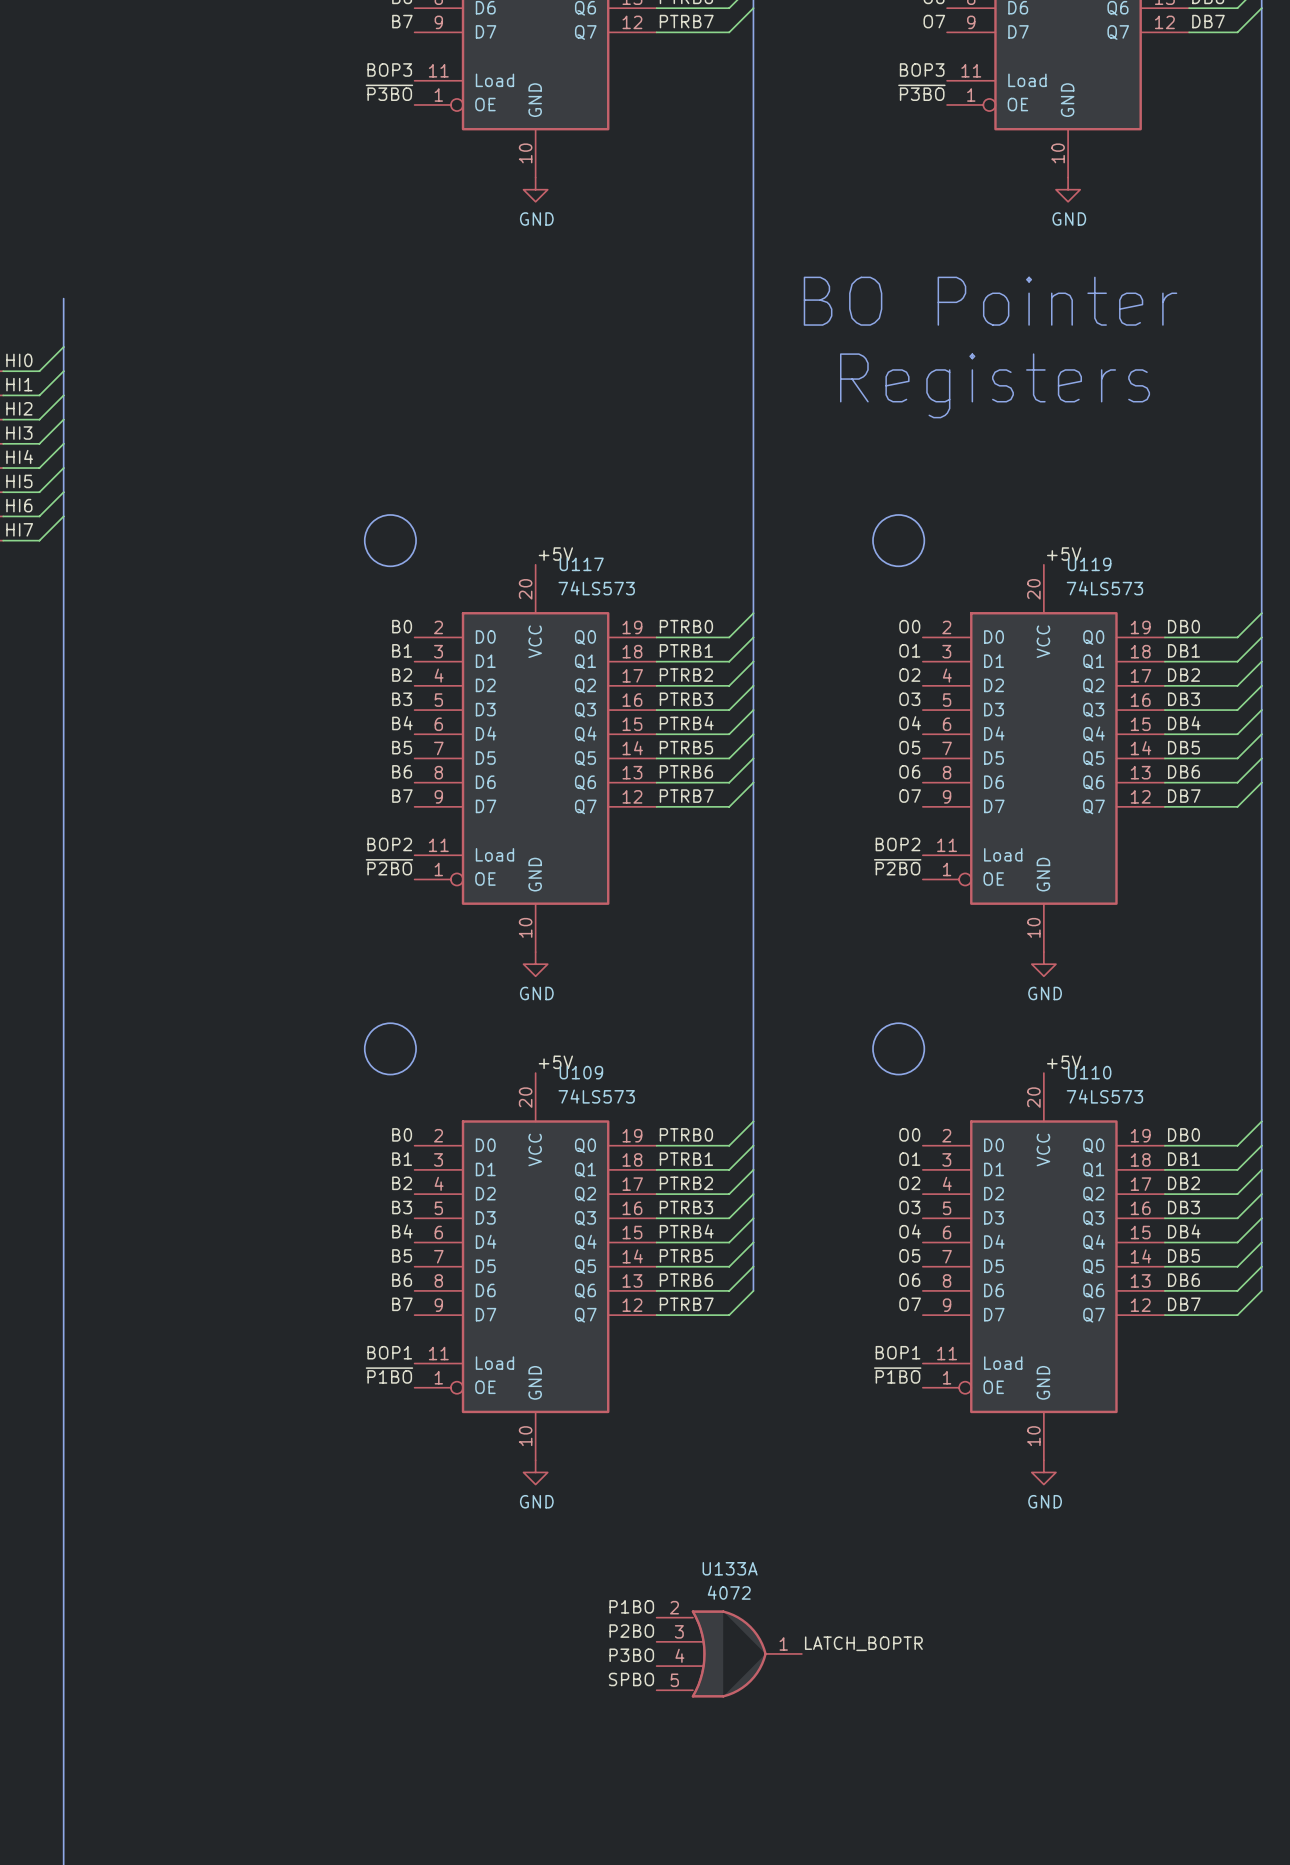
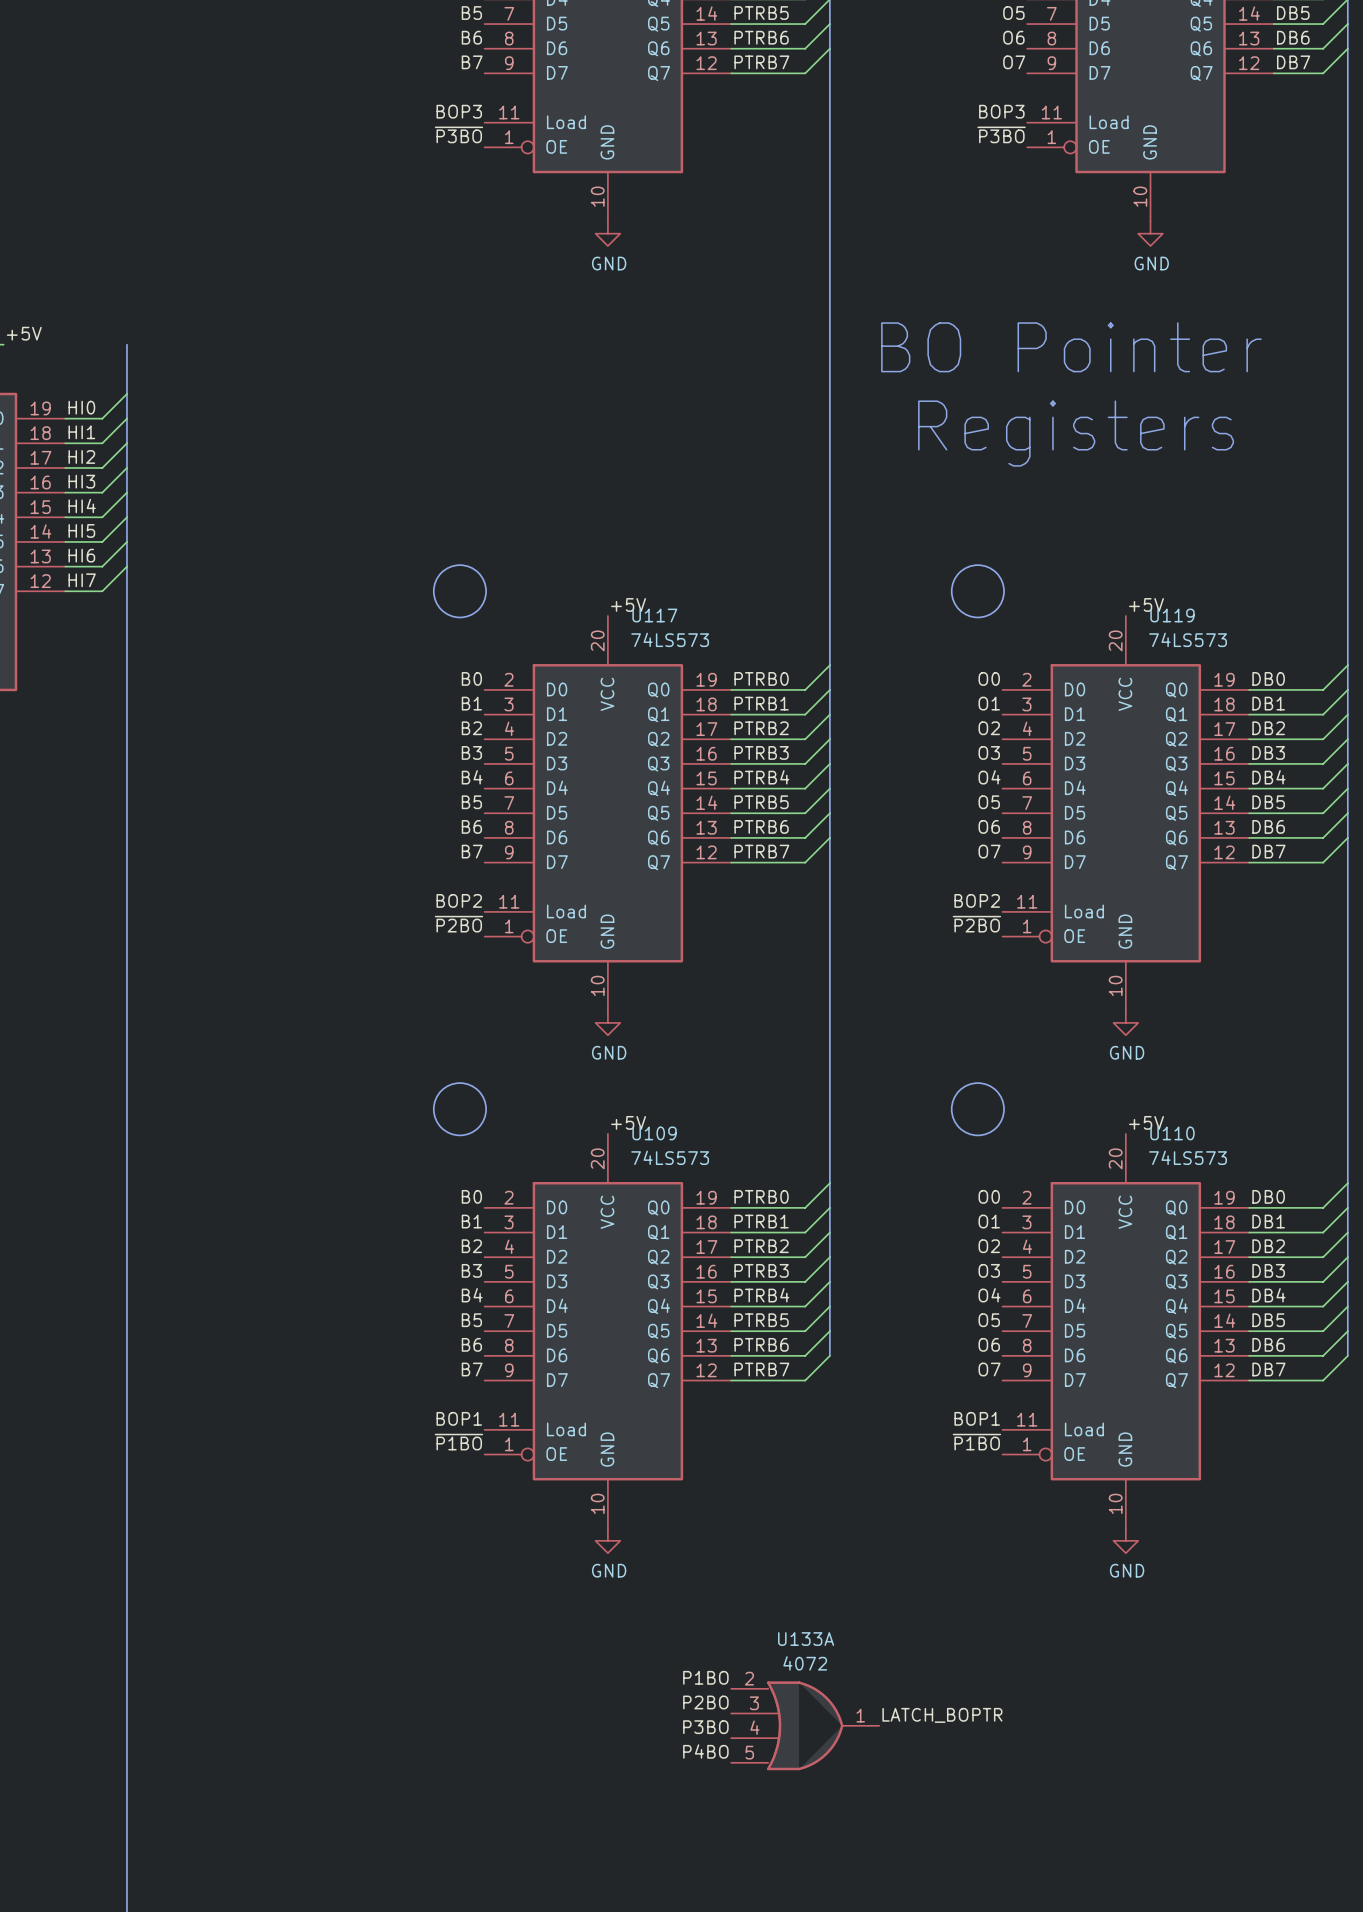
label: SPBO (631, 1679) -> P4BO (705, 1751)

